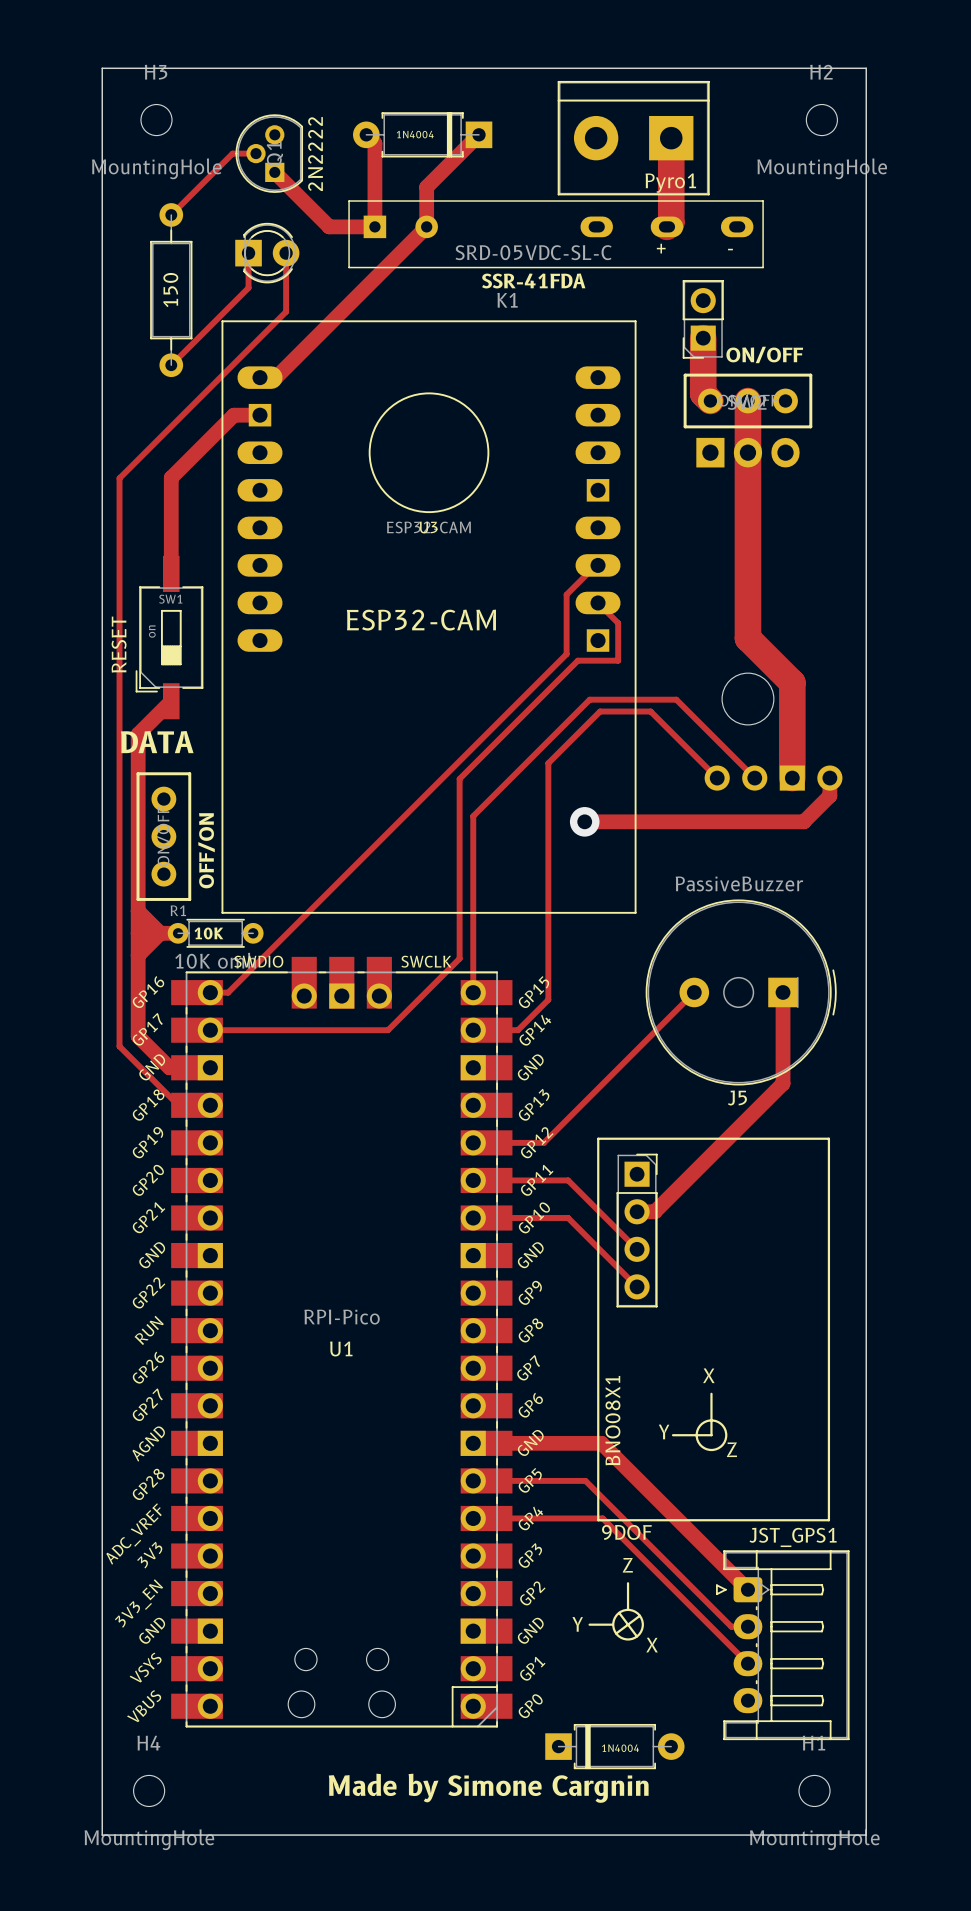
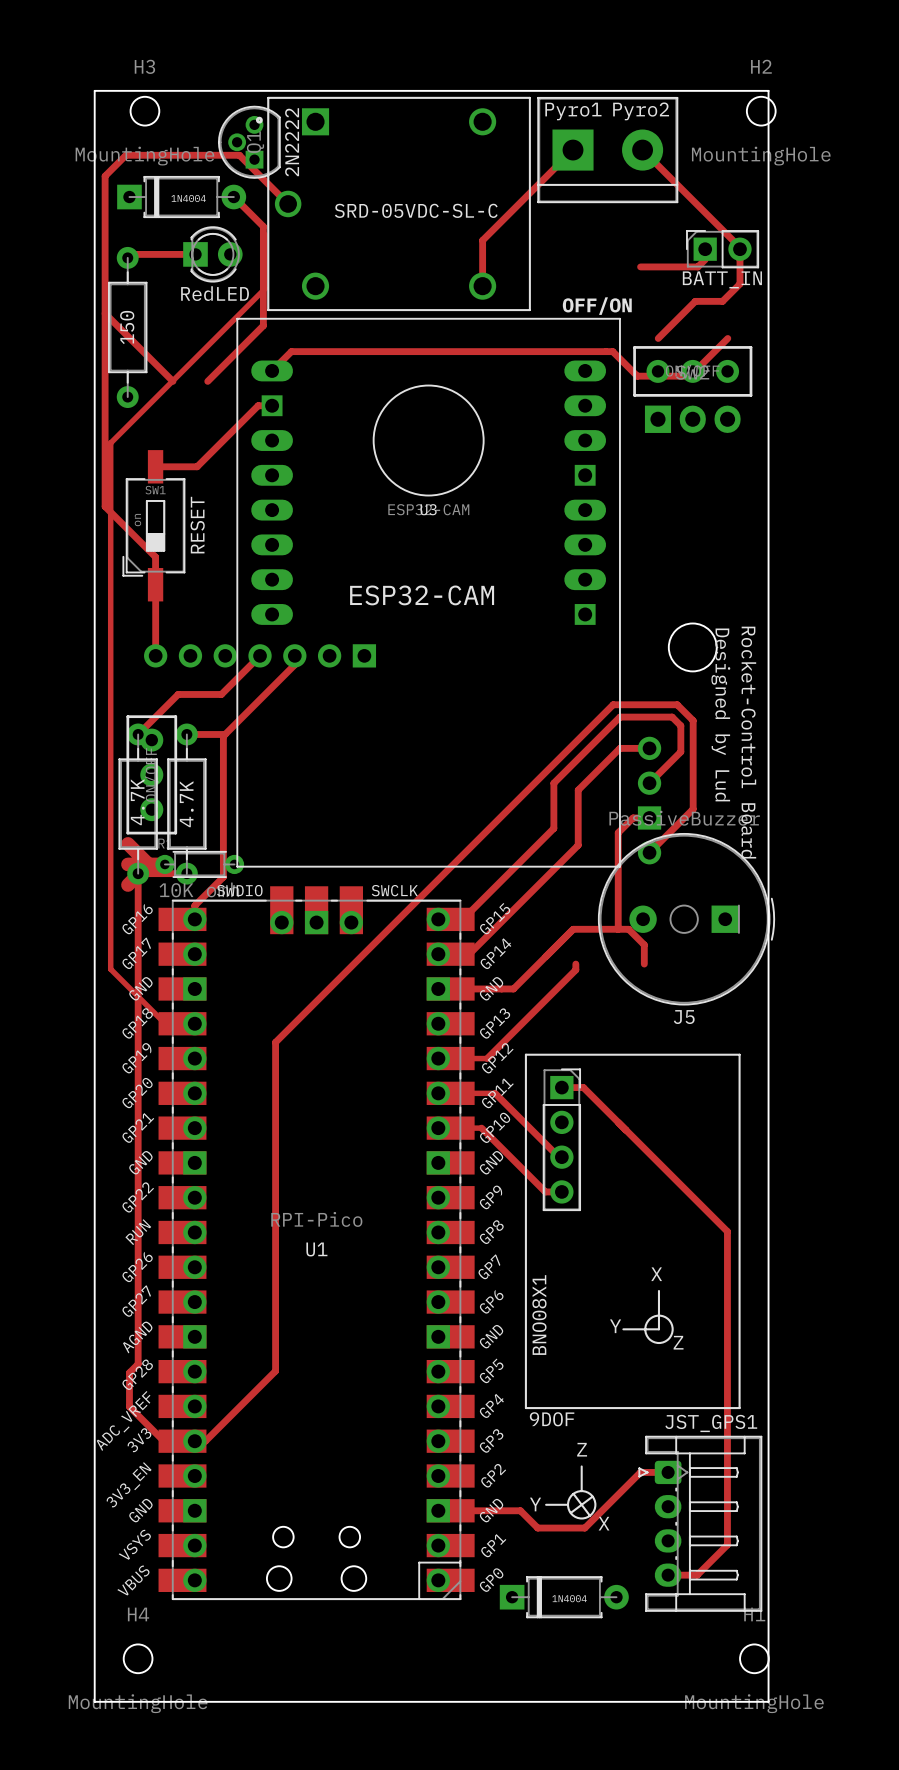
board edge: (102, 98) (102, 68) (866, 68) (866, 1835) (102, 1835) -> (94, 90) (768, 90) (768, 1701) (94, 1701) (94, 1699)
Pyro1 value: none -> Pyro2 (641, 111)
track: (366, 134) (374, 143) (374, 226) (329, 226) (274, 172) -> none
part rotation: 0° (422, 134) -> 180° (181, 197)
part position: (422, 134) -> (181, 197)
track: (478, 134) (426, 187) (426, 226) (275, 377) (269, 377) -> none
Pyro1 rotation: 0° (633, 138) -> 180° (607, 150)
track: (666, 142) (671, 138) (671, 222) (666, 226) -> none
track: (256, 153) (232, 153) (171, 214) -> none
track: none -> (573, 150) (482, 240) (482, 286)
track: none -> (642, 150) (739, 247) (739, 283) (722, 301) (695, 301) (658, 338)
track: none -> (288, 198) (288, 203) (239, 155) (125, 155) (105, 176) (105, 506) (155, 557) (155, 584)
track: none -> (230, 200) (233, 197) (263, 226) (263, 325) (207, 381)
part: none -> SRD-05VDC-SL-C (393, 203)
K1: SRD-05VDC-SL-C (556, 234) -> none
track: (248, 253) (248, 287) (171, 365) -> none
part: (267, 253) -> none
part: none -> BATT_IN (722, 249)
track: none -> (195, 254) (131, 254) (127, 257)
part: none -> RedLED (212, 254)
text: SSR-41FDA (533, 280) -> none
track: none -> (705, 259) (697, 266) (640, 266)
part position: (171, 290) -> (127, 327)
part: (703, 319) -> none
text: none -> OFF/ON (597, 306)
track: none -> (105, 313) (172, 381)
track: (703, 338) (703, 393) (710, 400) -> none
text: ON/OFF (764, 354) -> none
track: none -> (727, 338) (690, 376) (637, 376) (612, 351) (291, 351) (272, 370)
track: (747, 400) (747, 638) (792, 682) (792, 778) -> none
track: (260, 415) (233, 415) (171, 477) (171, 573) -> none
track: none -> (272, 405) (258, 405) (197, 466) (155, 466)
track: (598, 565) (566, 594) (566, 654) (228, 992) (210, 992) -> (294, 655) (294, 664) (223, 736) (223, 877) (194, 905) (194, 919)
track: (598, 602) (618, 623) (618, 660) (577, 660) (459, 778) (459, 958) (388, 1030) (210, 1030) -> none
U3 position: (429, 617) -> (428, 592)
track: none -> (155, 584) (155, 655)
SW1 position: (169, 637) -> (153, 525)
SW1 value position: RESET (119, 644) -> RESET (197, 525)
track: (171, 701) (138, 734) (138, 1036) (169, 1067) (210, 1067) -> none
track: none -> (260, 655) (221, 694) (178, 694) (138, 734) (132, 734)
part: none -> (260, 655)
text: DATA (157, 742) -> none
text: none -> Designed by Lud (720, 714)
text: none -> Rocket-Control Board (748, 742)
track: (717, 778) (650, 711) (600, 711) (548, 763) (548, 999) (518, 1030) (506, 1030) -> (649, 748) (619, 748) (578, 790) (578, 845) (469, 954)
track: (754, 778) (676, 699) (589, 699) (473, 816) (473, 992) -> (649, 783) (680, 751) (680, 725) (672, 717) (619, 717) (553, 783) (553, 828) (462, 919) (438, 919)
part rotation: 0° (773, 778) -> 90° clockwise (649, 800)
part position: (773, 778) -> (649, 800)
track: (829, 778) (829, 795) (803, 821) (584, 821) -> none
track: none -> (186, 734) (225, 734)
via: (584, 821) -> none
text: OFF/ON (206, 850) -> none
text: none -> 4.7K (137, 802)
part: none -> (138, 804)
part: none -> (186, 804)
track: none -> (649, 817) (633, 817) (618, 832) (618, 929)
track: none -> (649, 852) (693, 809) (693, 720) (677, 704) (613, 704) (275, 1042) (275, 1371) (205, 1441) (163, 1441) (129, 1406) (129, 1372) (138, 1364) (138, 873) (186, 873)
text: 10K (208, 933) -> none
track: (694, 992) (543, 1142) (526, 1142) -> (575, 964) (575, 969) (487, 1058)
track: (783, 992) (783, 1083) (654, 1211) (637, 1211) -> none
track: none -> (644, 964) (644, 944) (628, 929) (573, 929) (513, 988) (438, 988)
line: (598, 1138) (598, 1520) -> (554, 1054) (525, 1054) (525, 1408) (554, 1408)
line: (798, 1138) (828, 1138) (828, 1520) (798, 1520) -> (739, 1054) (739, 1408)
track: none -> (561, 1087) (583, 1087) (727, 1231) (727, 1544) (697, 1575) (668, 1575)
track: (534, 1180) (568, 1180) (637, 1249) -> (495, 1093) (558, 1157) (561, 1157)
track: (519, 1217) (568, 1217) (637, 1286) -> (481, 1128) (545, 1191) (561, 1191)
BNO08X1 position: (637, 1230) -> (561, 1139)
track: (473, 1443) (601, 1443) (747, 1589) -> none
track: (473, 1480) (585, 1480) (731, 1626) (747, 1626) -> none
track: (473, 1518) (602, 1518) (747, 1663) -> none
track: none -> (668, 1472) (640, 1472) (584, 1528) (537, 1528) (520, 1510) (438, 1510)
JST_GPS1 position: (782, 1645) -> (700, 1523)
part position: (614, 1746) -> (564, 1597)
text: Made by Simone Cargnin (488, 1788) -> none

